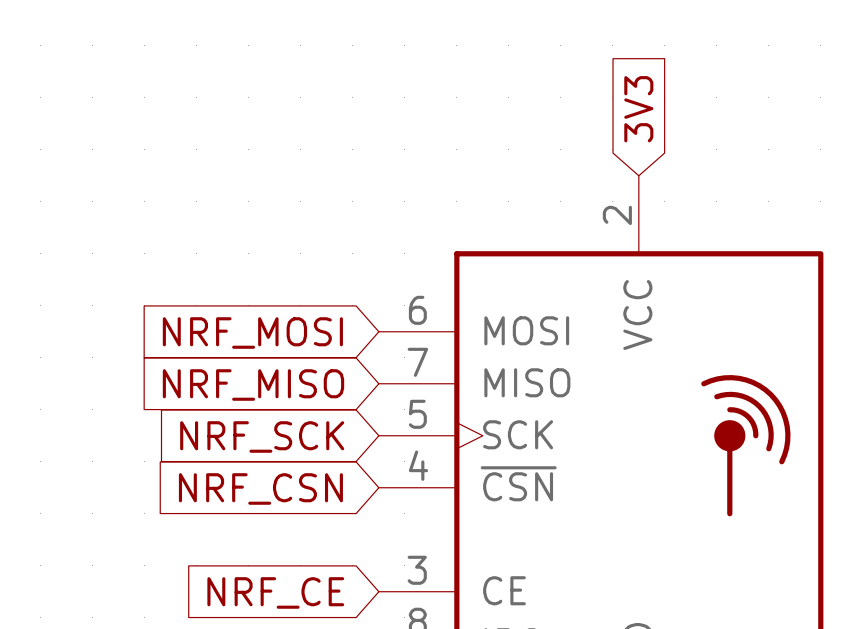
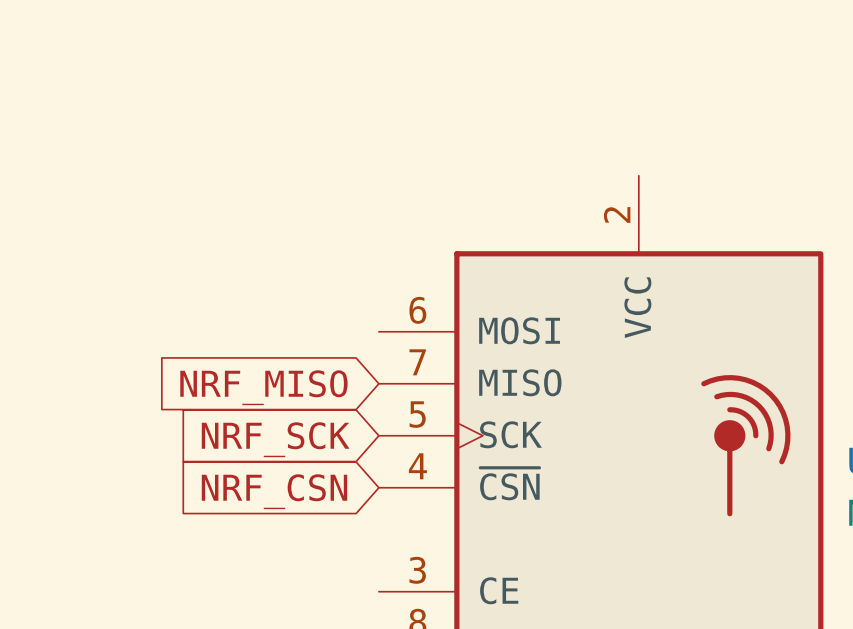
global label: 3V3 (638, 109) -> none
global label: NRF_MOSI (252, 333) -> none
global label: NRF_CE (275, 592) -> none

